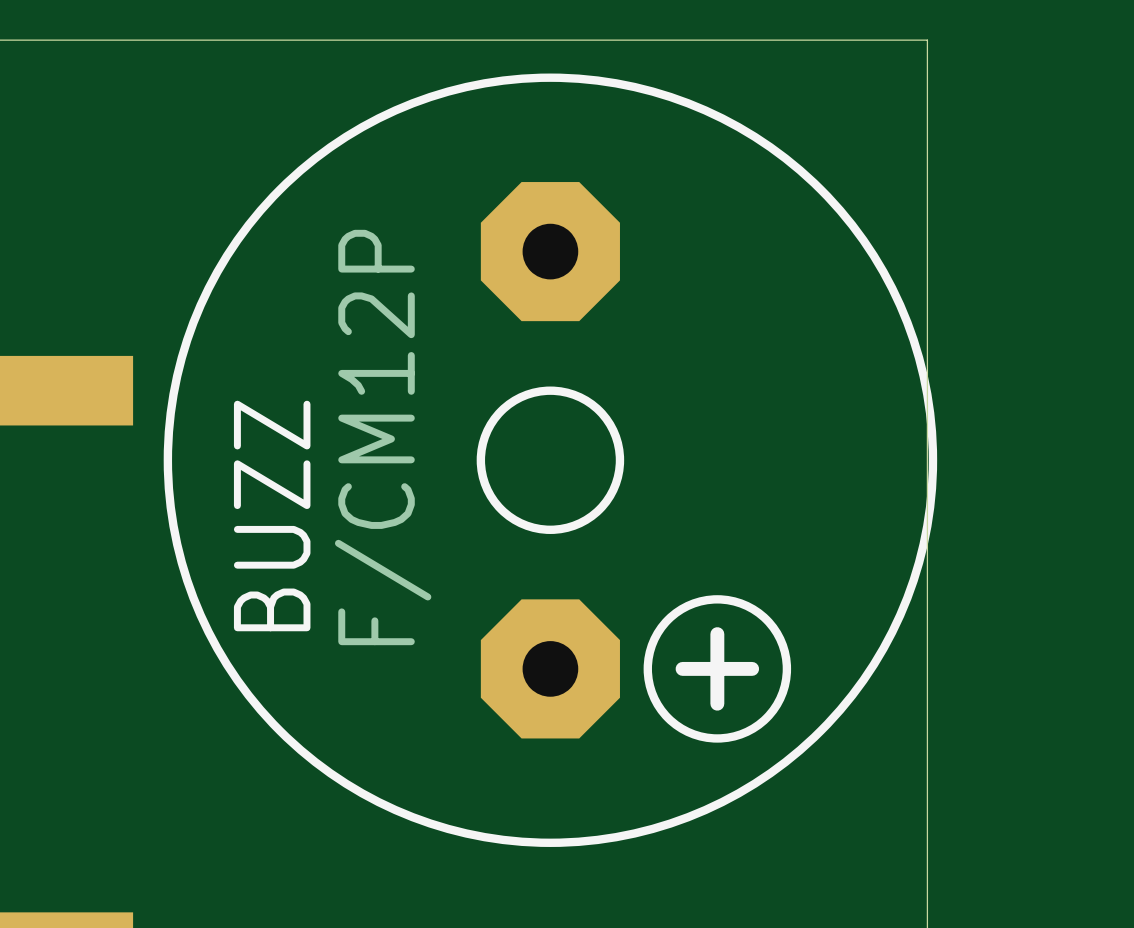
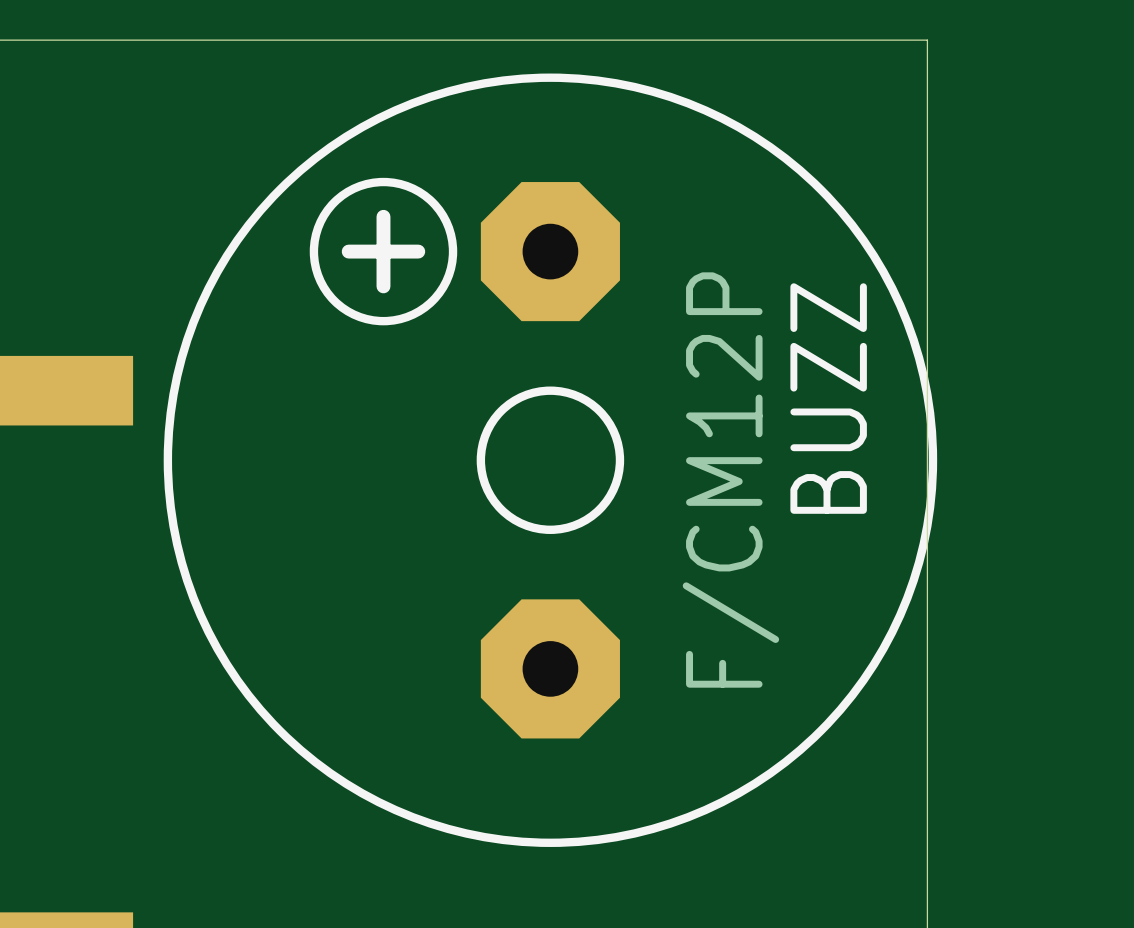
BUZZ rotation: 0° (550, 460) -> 180° (550, 460)

